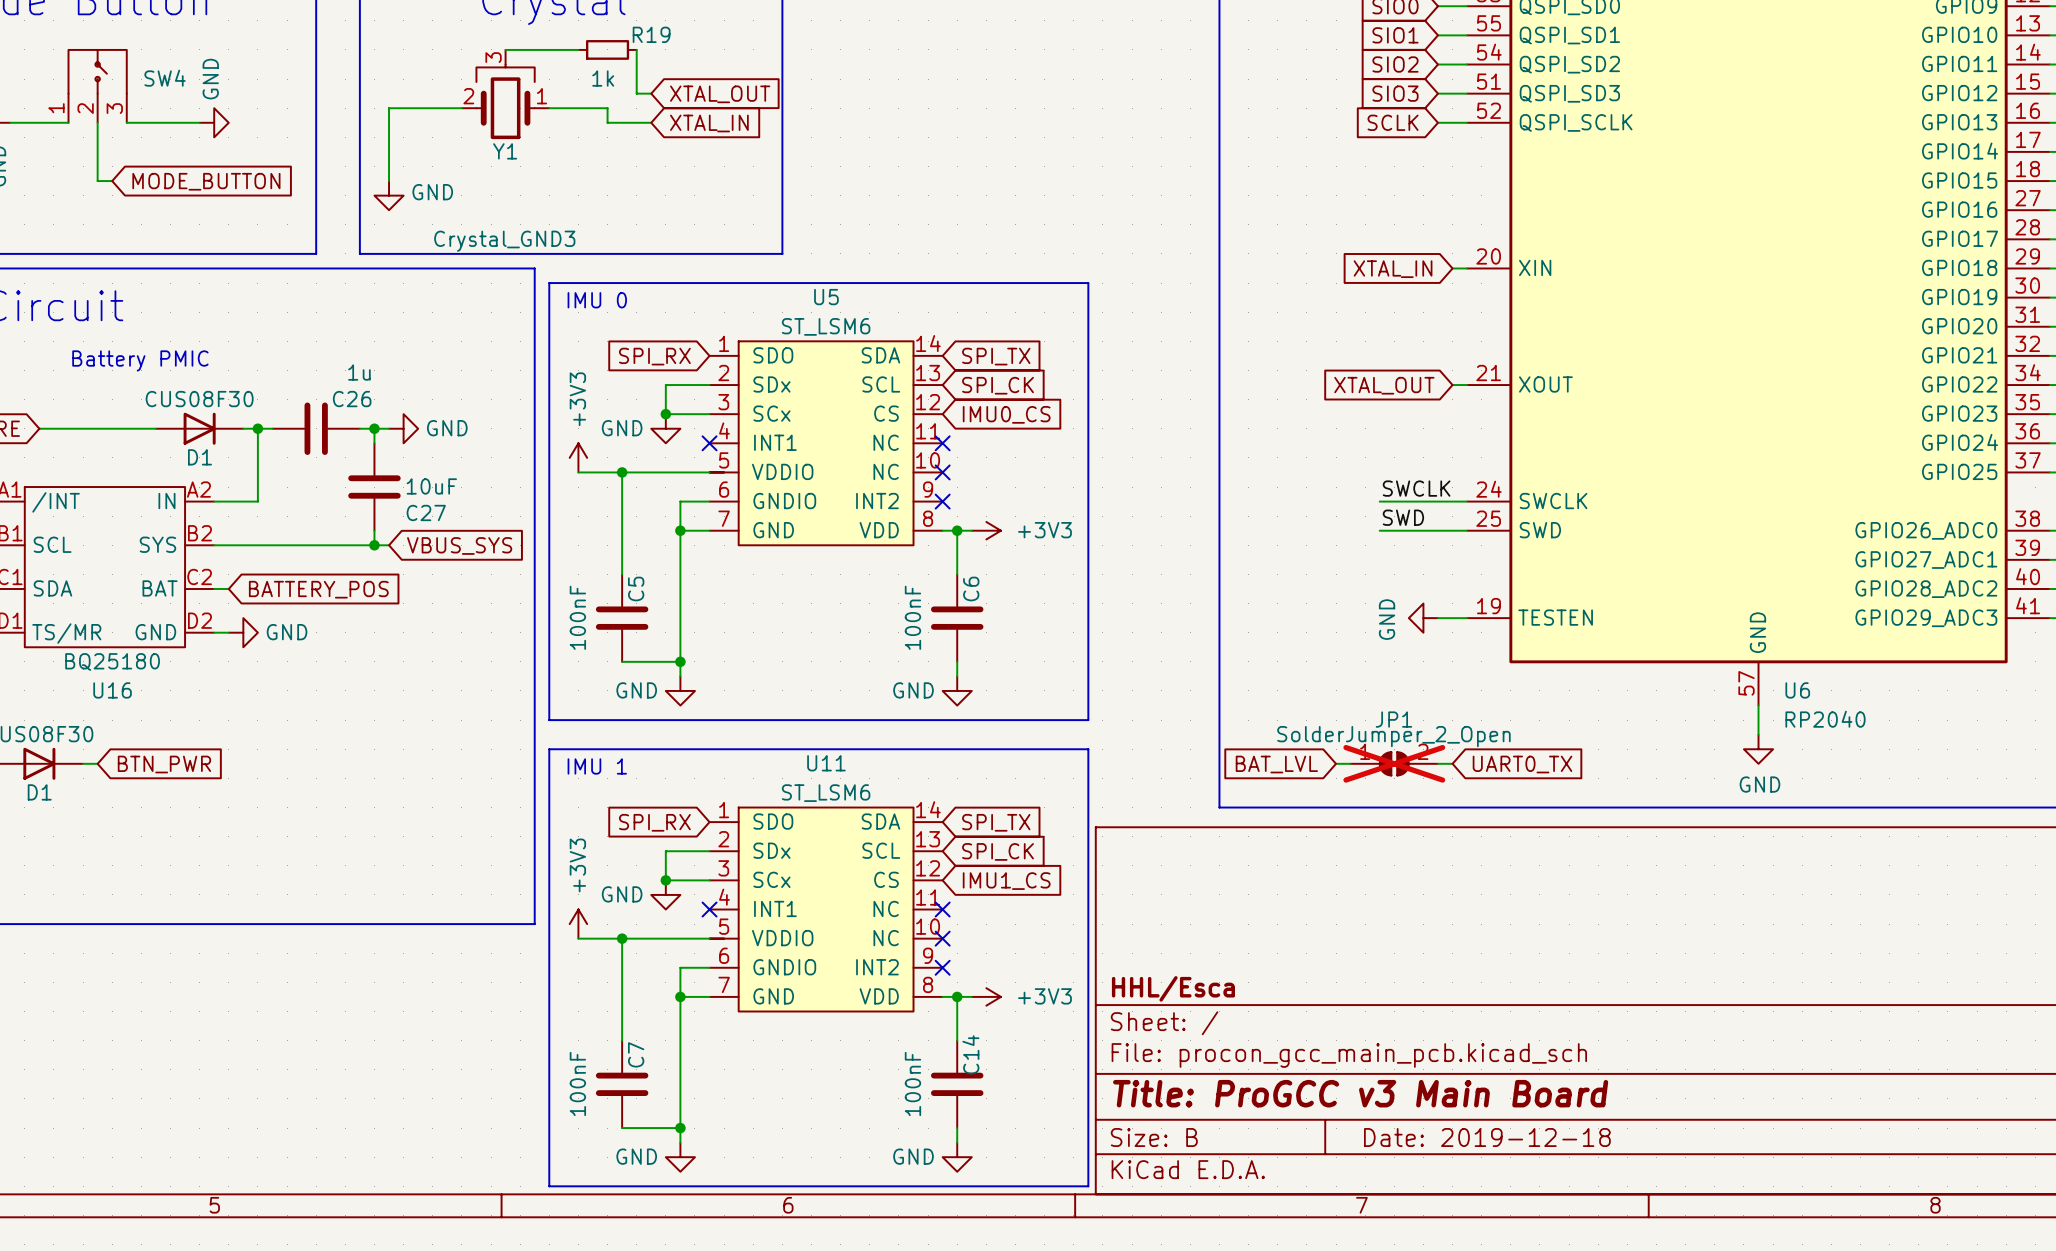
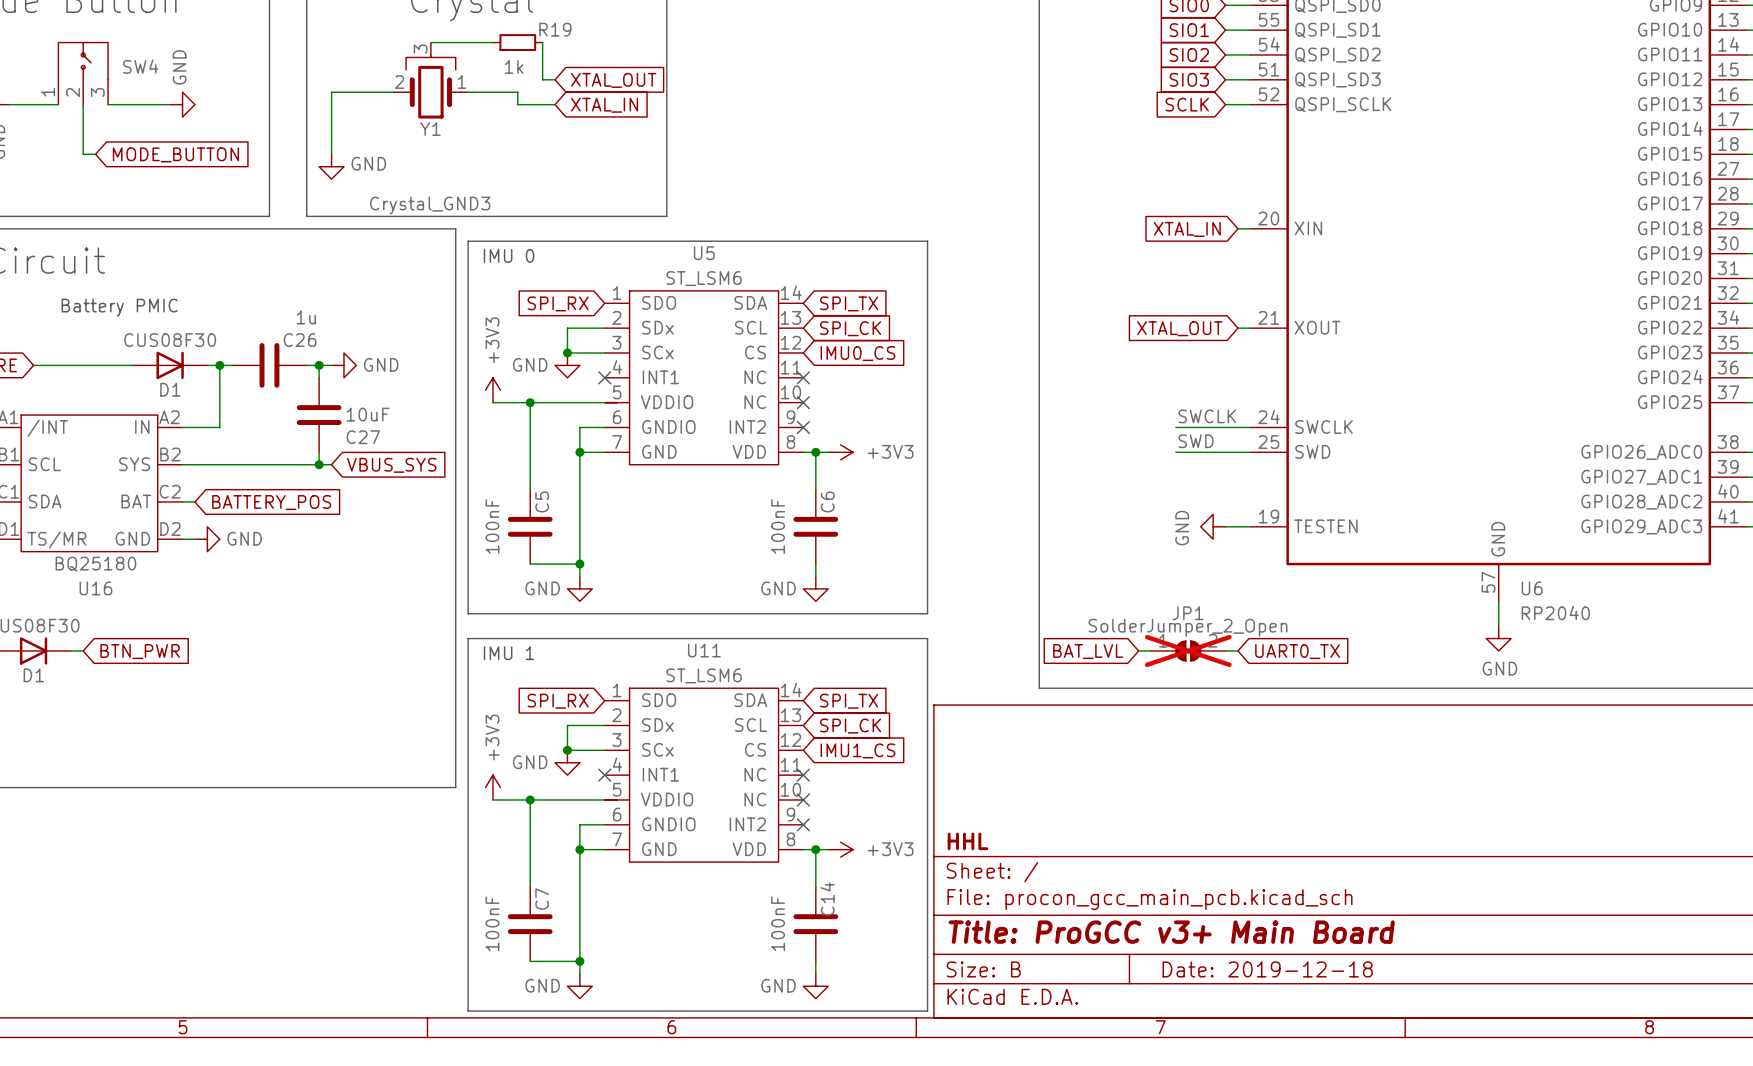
title block: HHL/Esca (1173, 988) -> HHL (967, 841)
title block: Title: ProGCC v3 Main Board (1360, 1093) -> Title: ProGCC v3+ Main Board (1171, 932)

